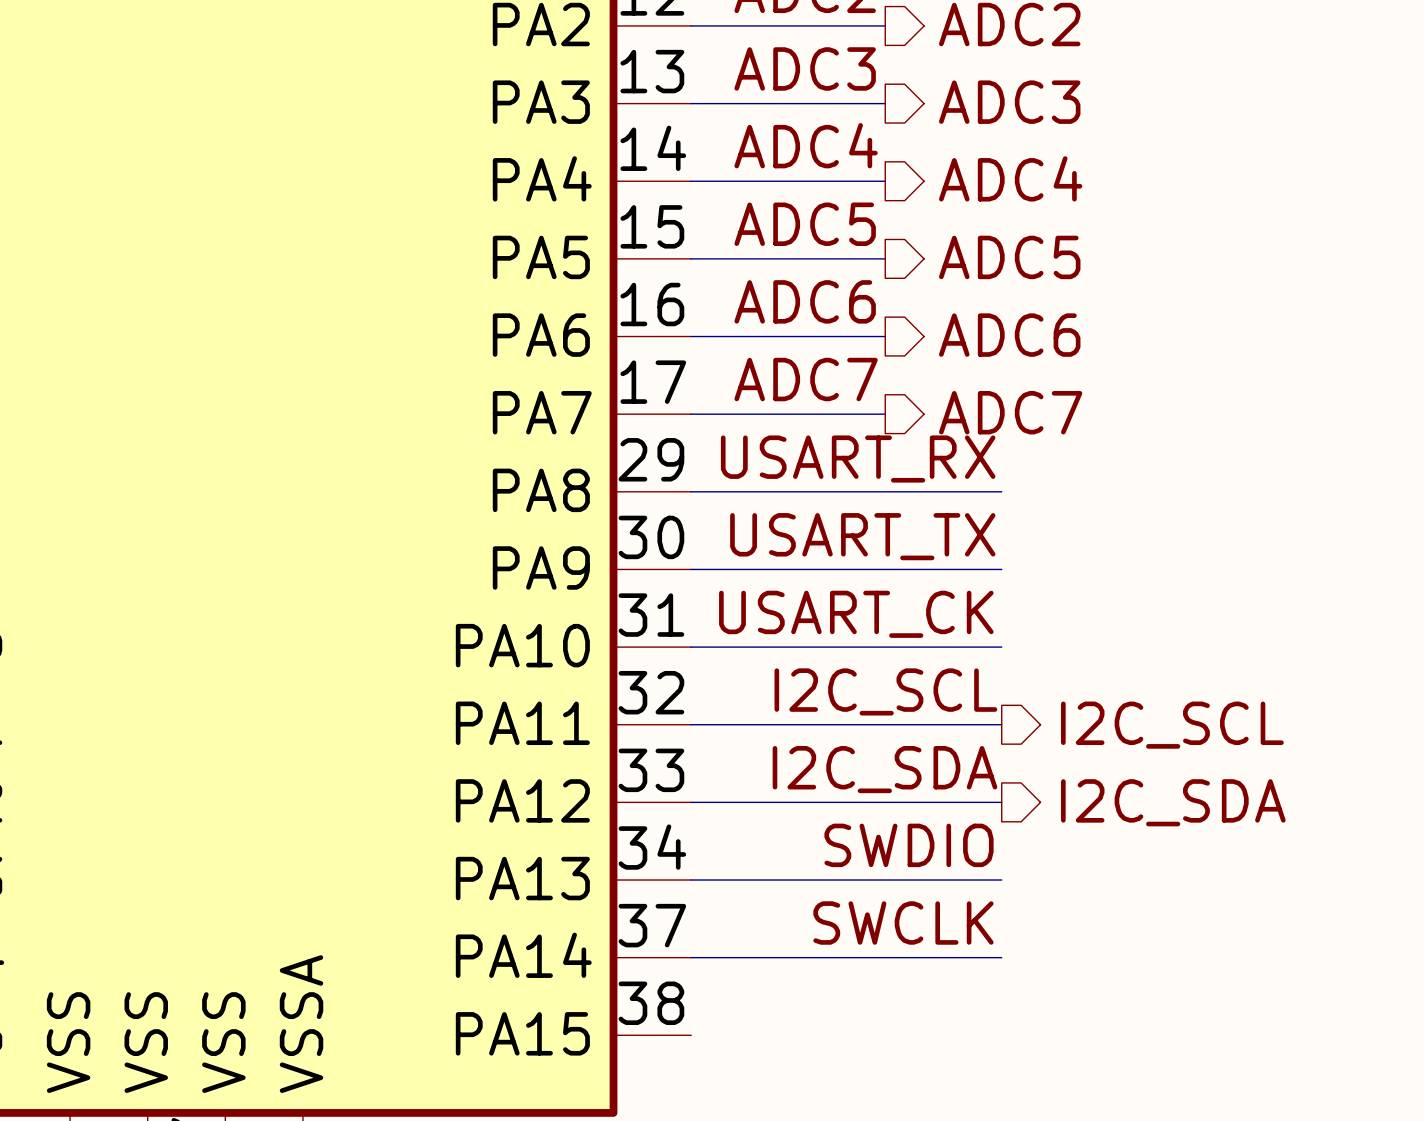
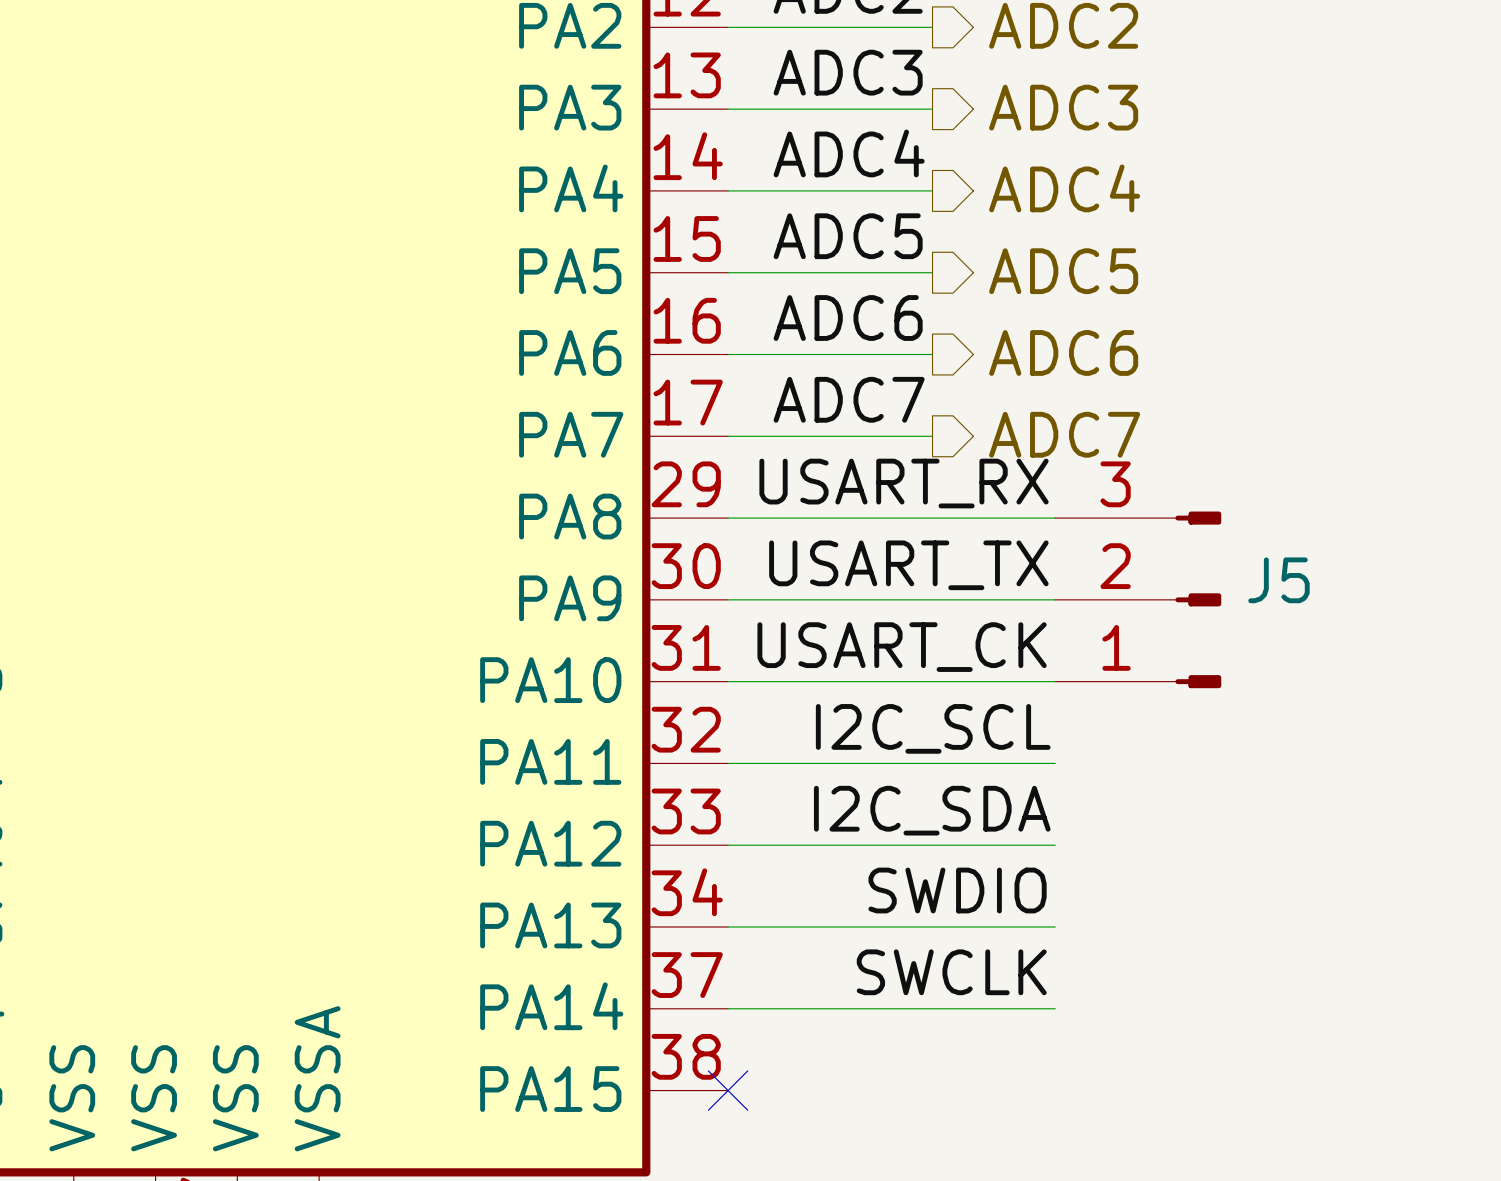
J5: none -> (1138, 599)
hierarchical label: I2C_SCL (1172, 725) -> none
hierarchical label: I2C_SDA (1173, 802) -> none
no-connect mark: none -> (728, 1090)

